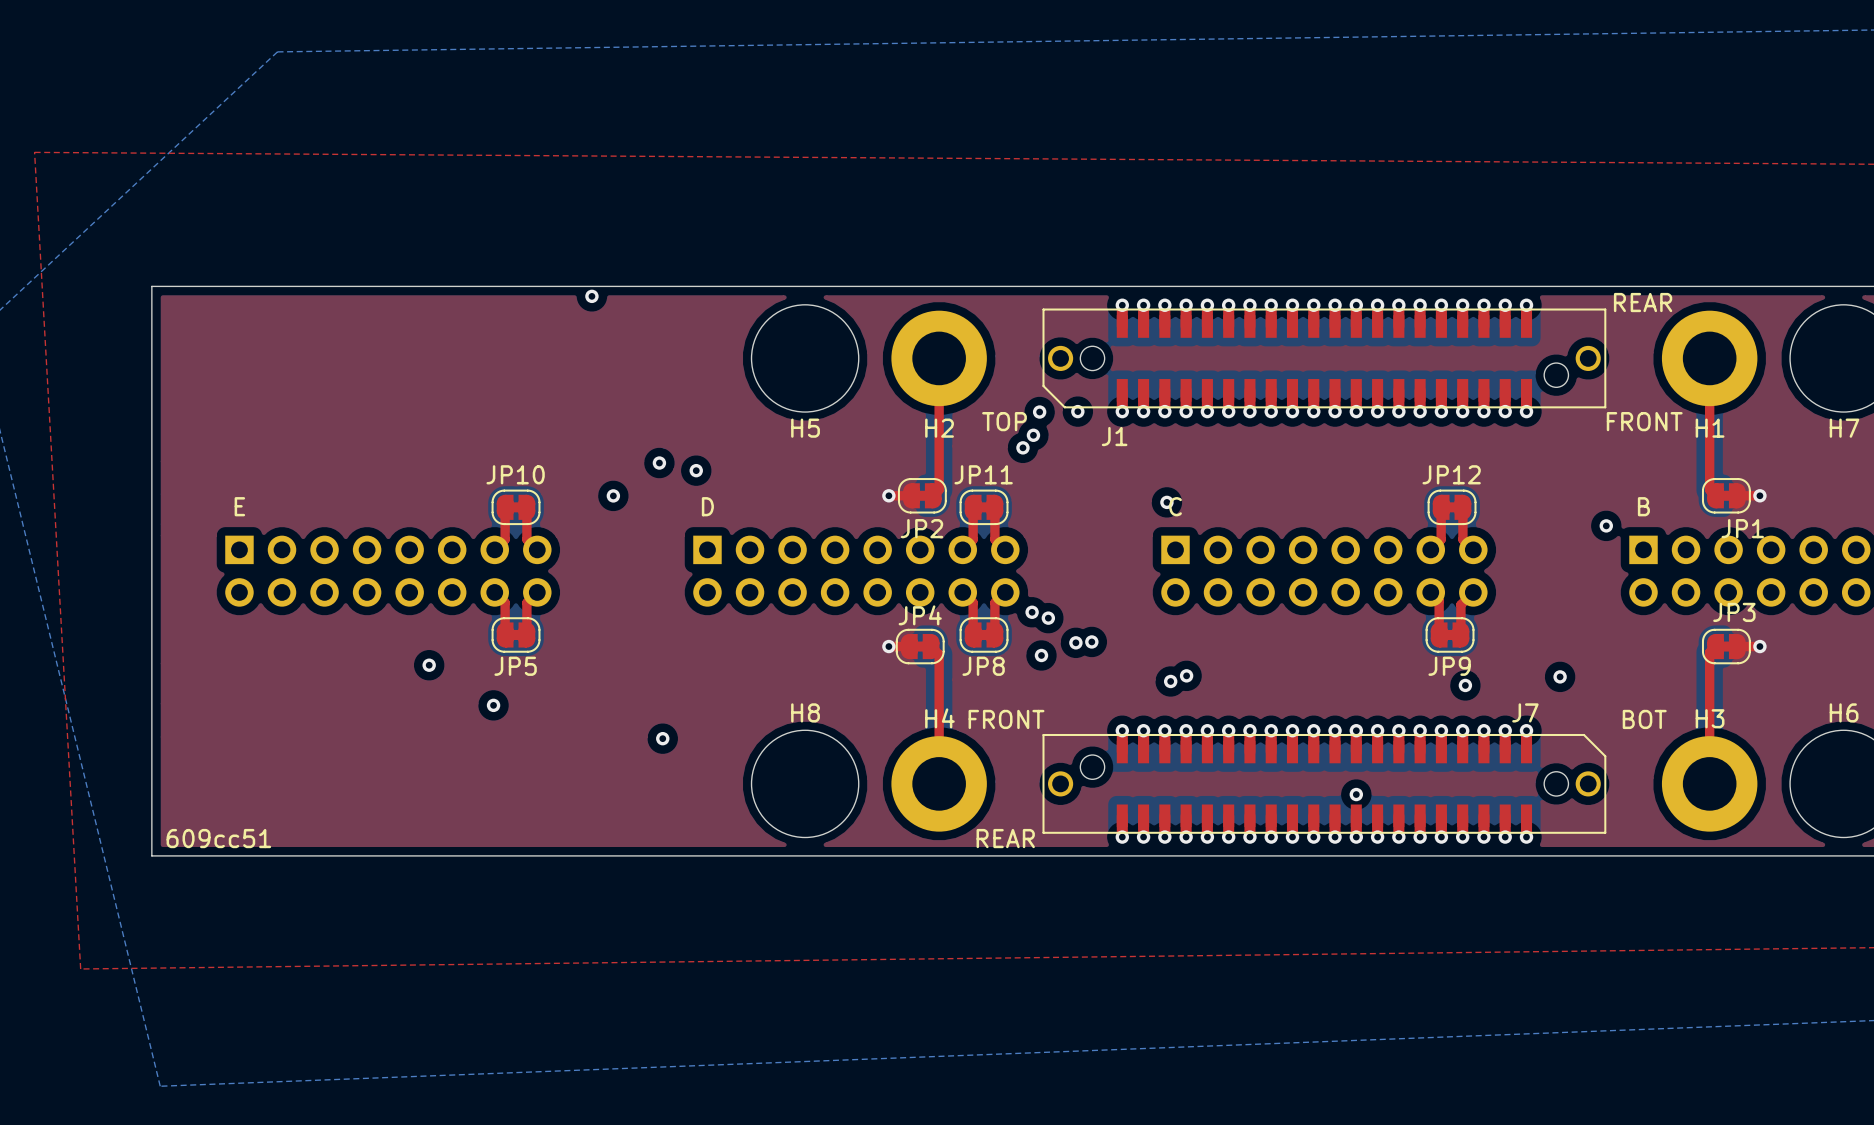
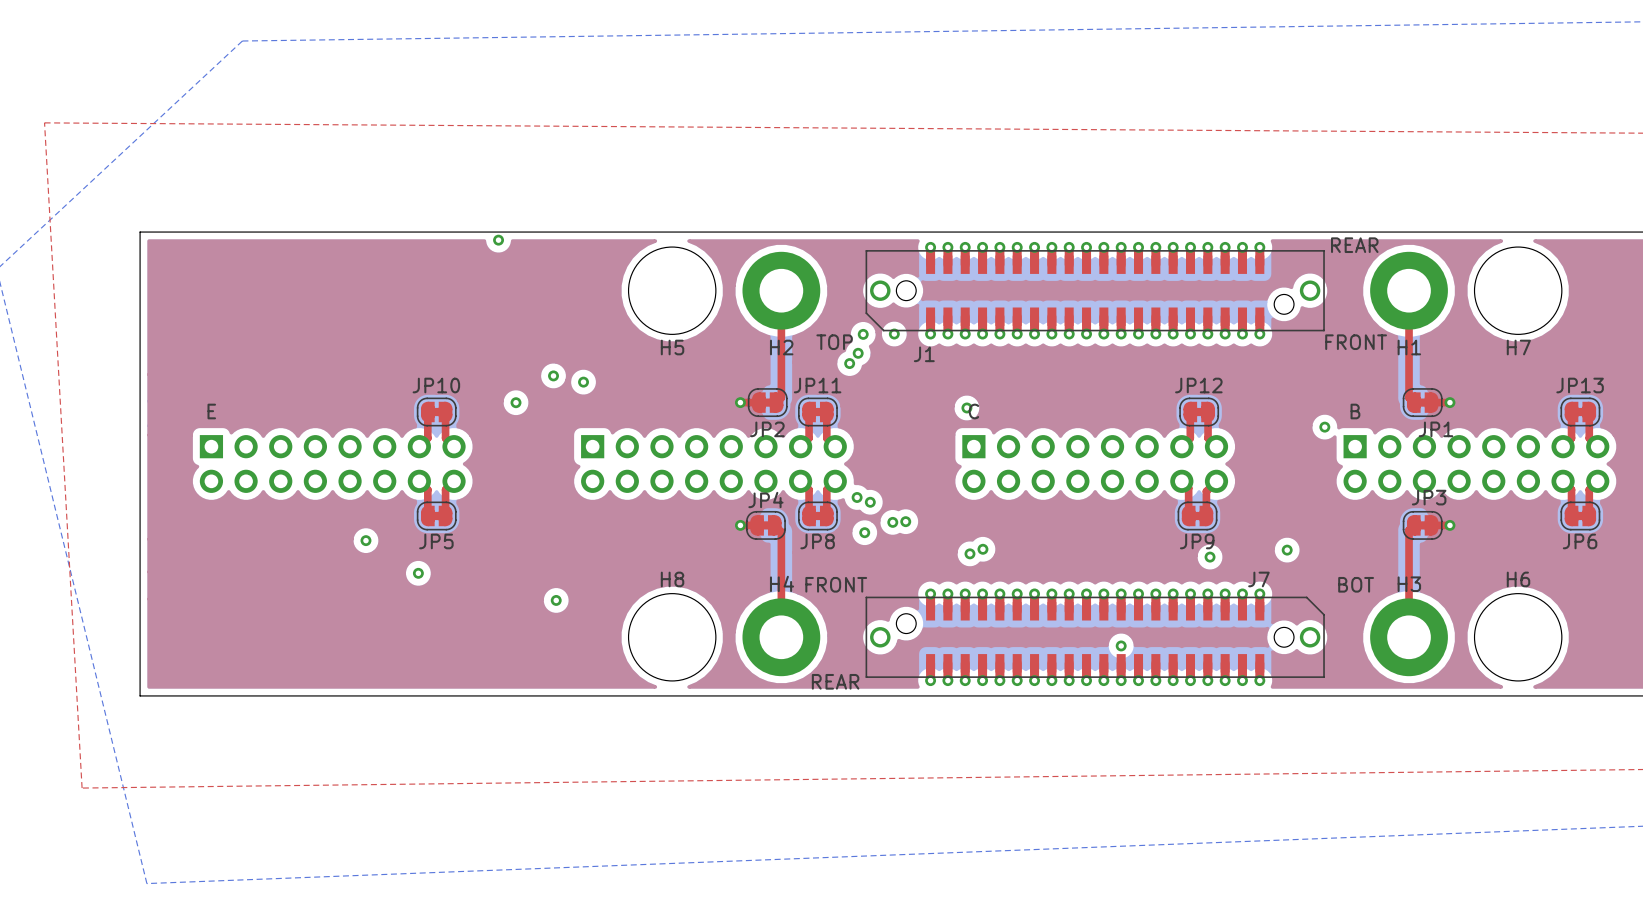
text: D (707, 506) -> none
text: 609cc51 (218, 838) -> none

